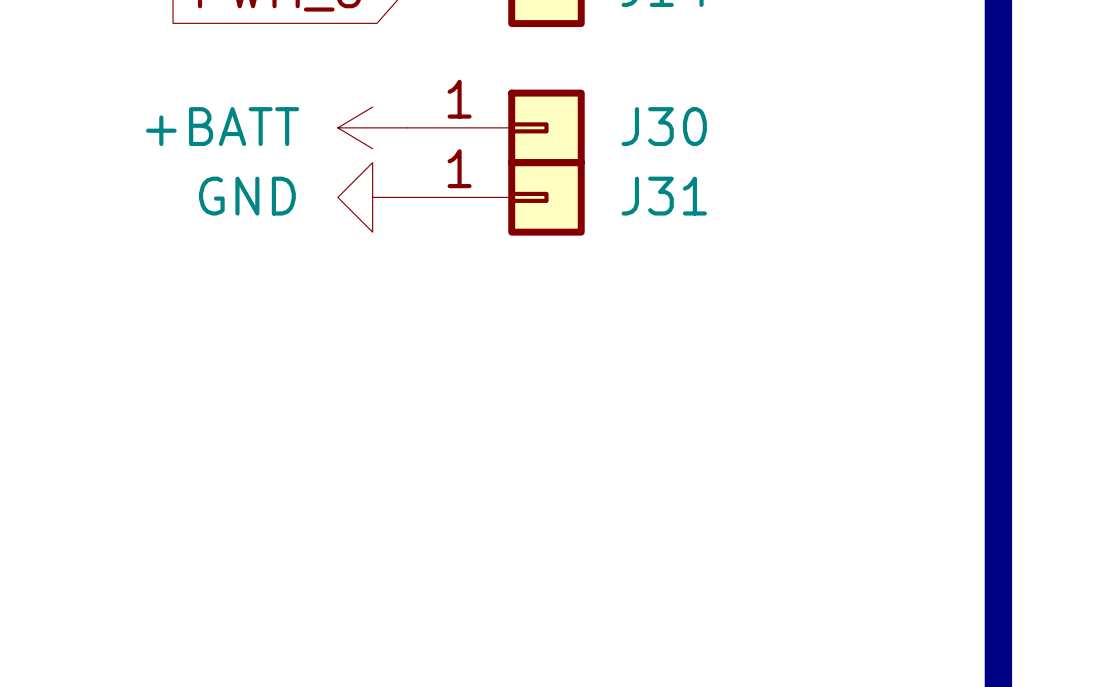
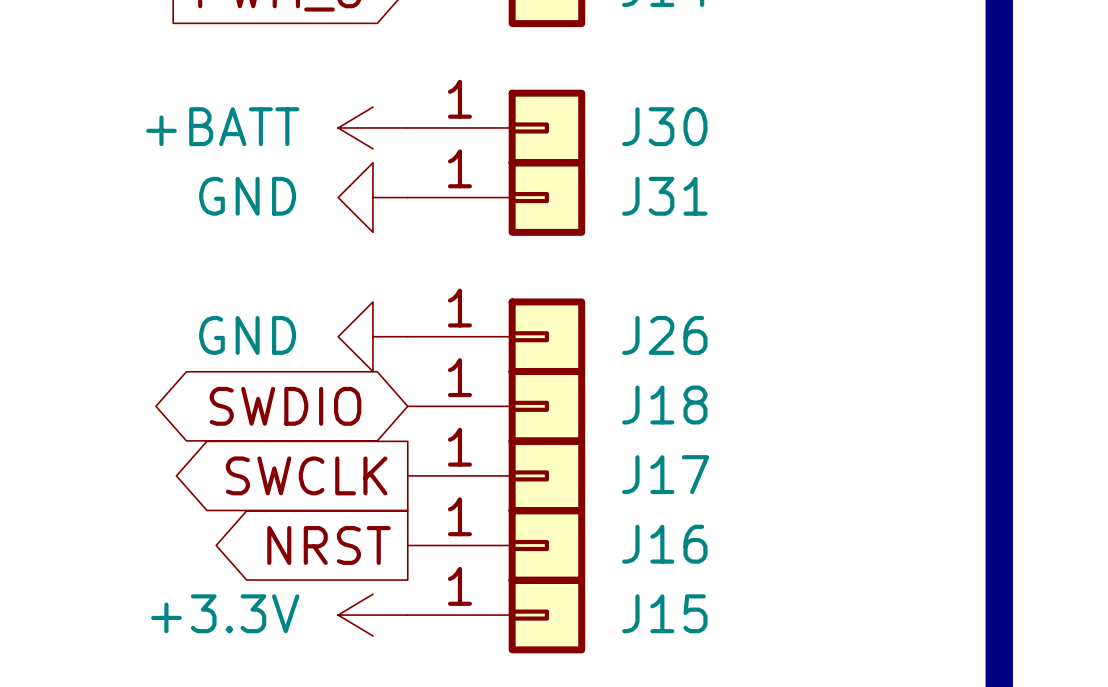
power symbol: none -> GND (372, 336)
J26: none -> (496, 336)
global label: none -> SWDIO (285, 406)
J18: none -> (496, 406)
global label: none -> SWCLK (306, 475)
J17: none -> (496, 475)
global label: none -> NRST (329, 545)
J16: none -> (496, 545)
power symbol: none -> +3.3V (372, 615)
J15: none -> (496, 615)

